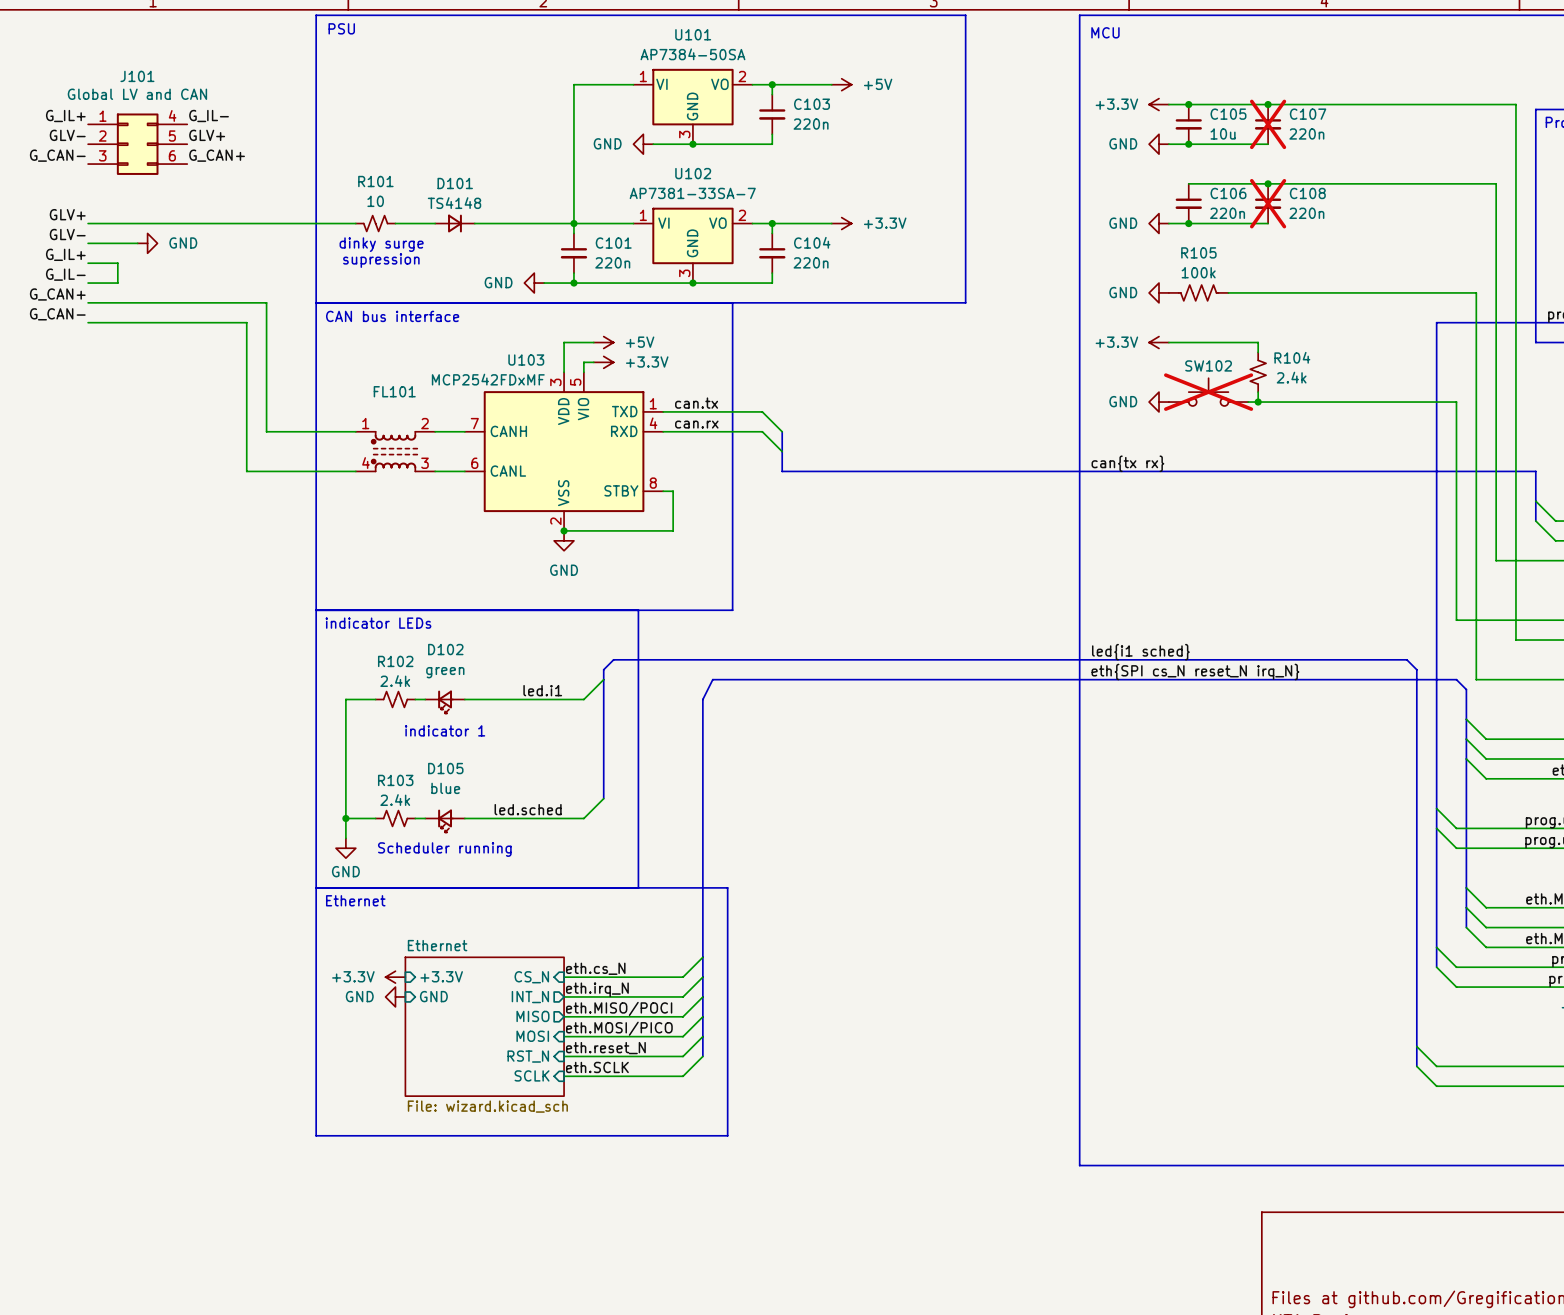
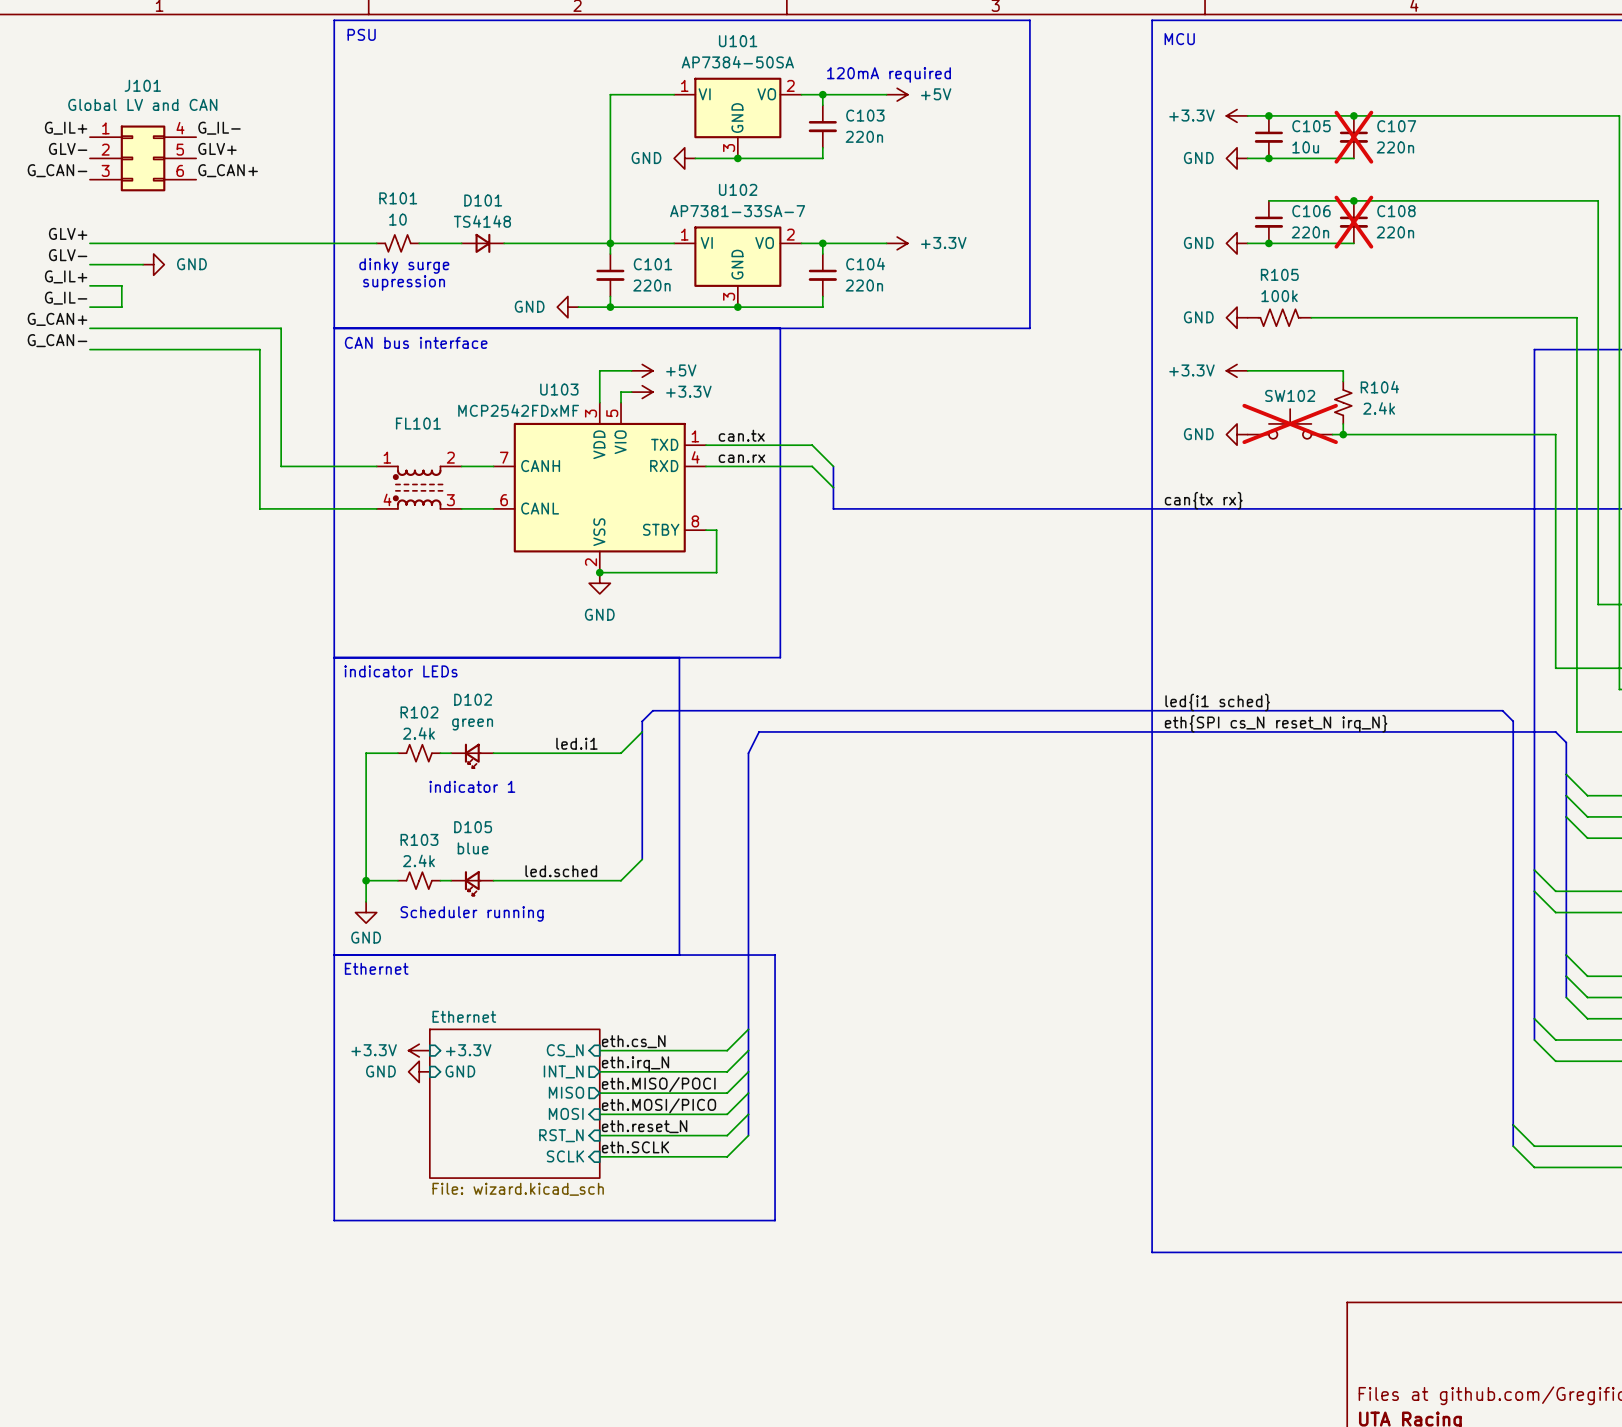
text: none -> 120mA required (889, 75)

